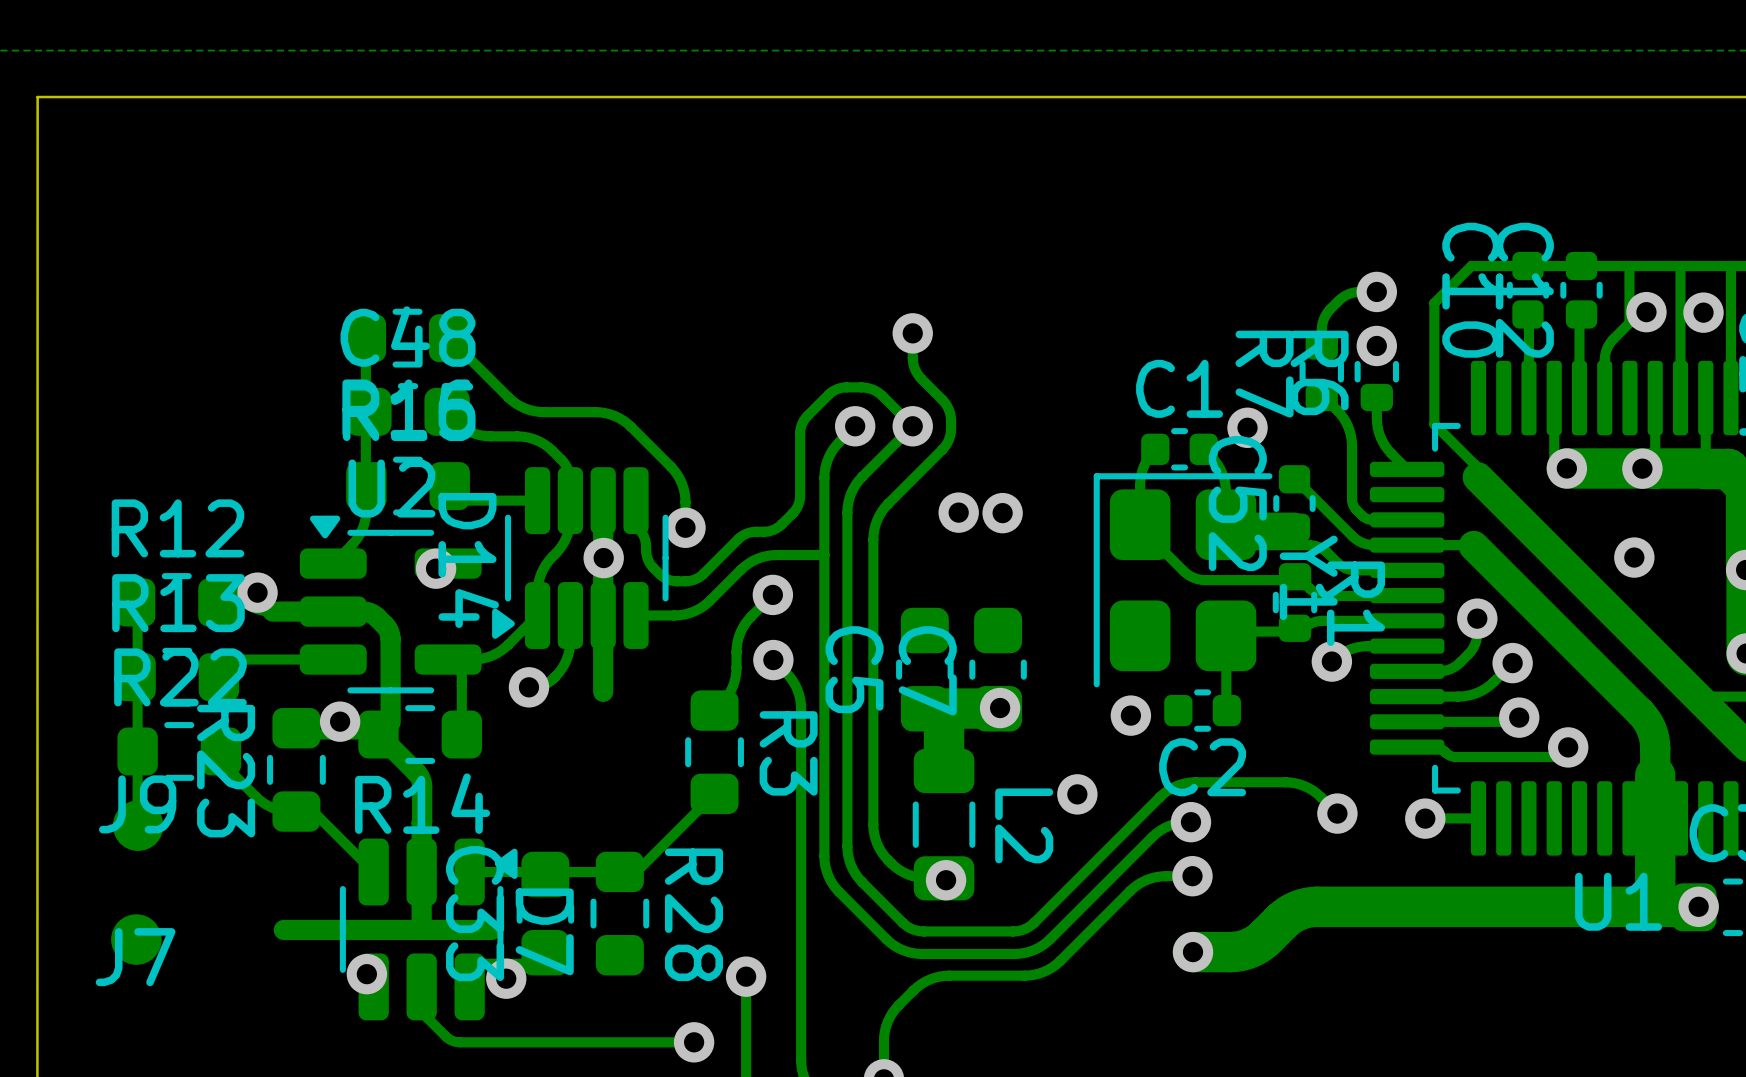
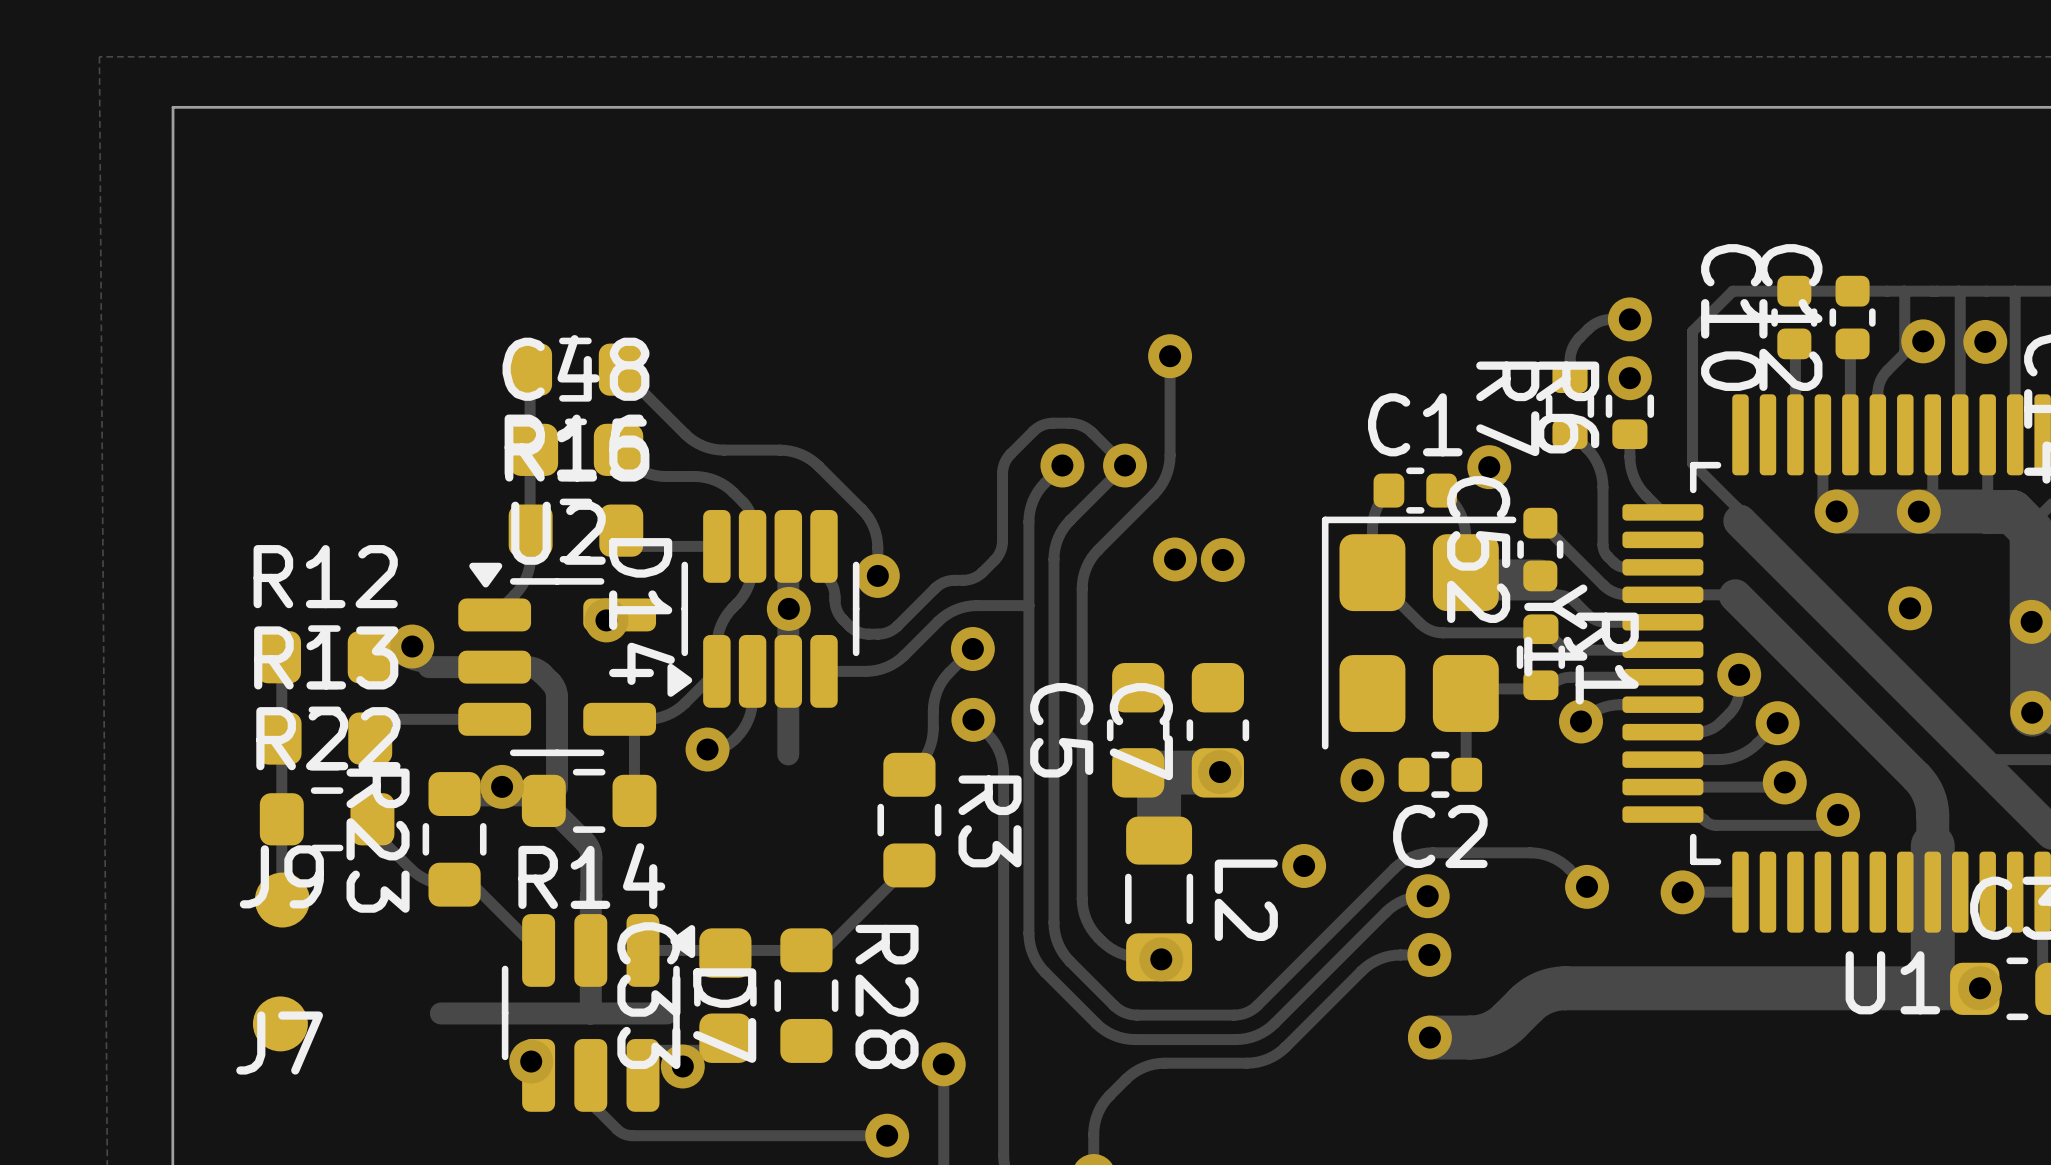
track: (912, 333) (912, 360) (915, 369) (919, 376) (944, 401) (950, 415) (949, 437) (939, 452) -> (1170, 356) (1169, 460) (1163, 481) (1153, 494)
via position: (912, 333) -> (1170, 356)

